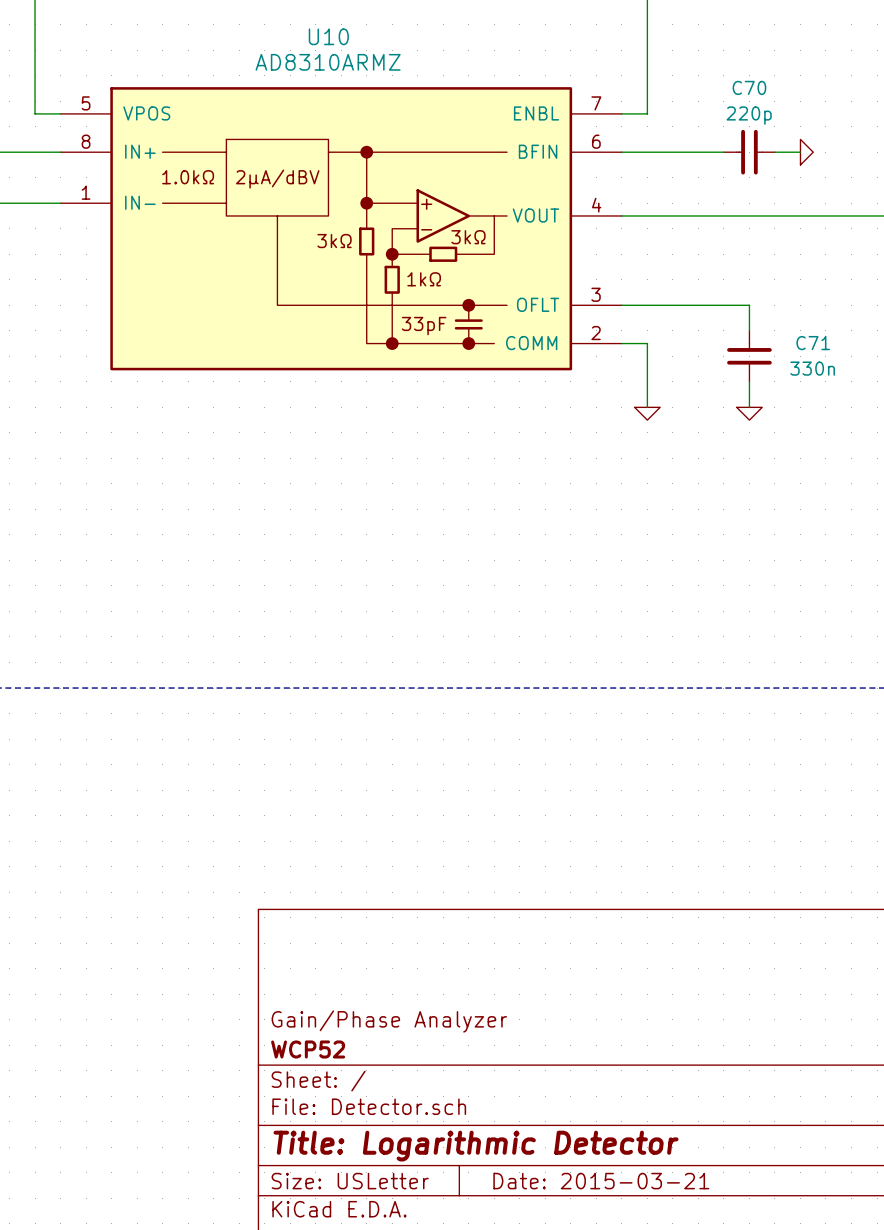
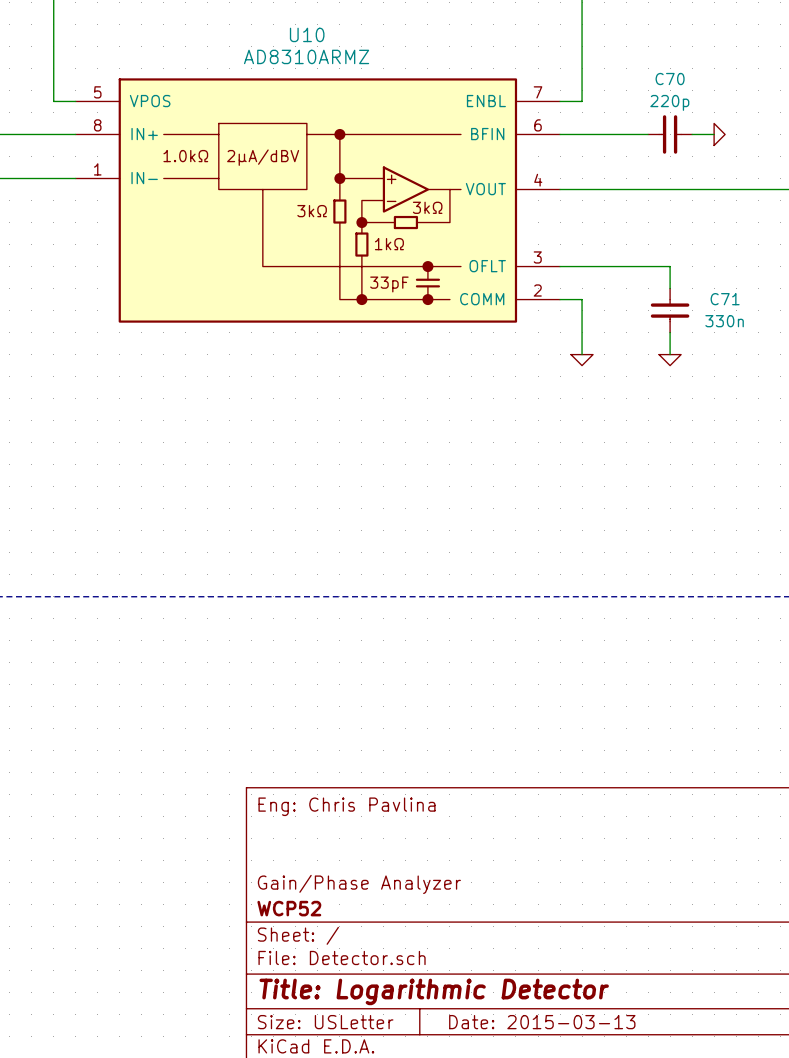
title block: none -> Eng: Chris Pavlina (347, 806)
title block: Date: 2015-03-21 (601, 1181) -> Date: 2015-03-13 (542, 1022)

